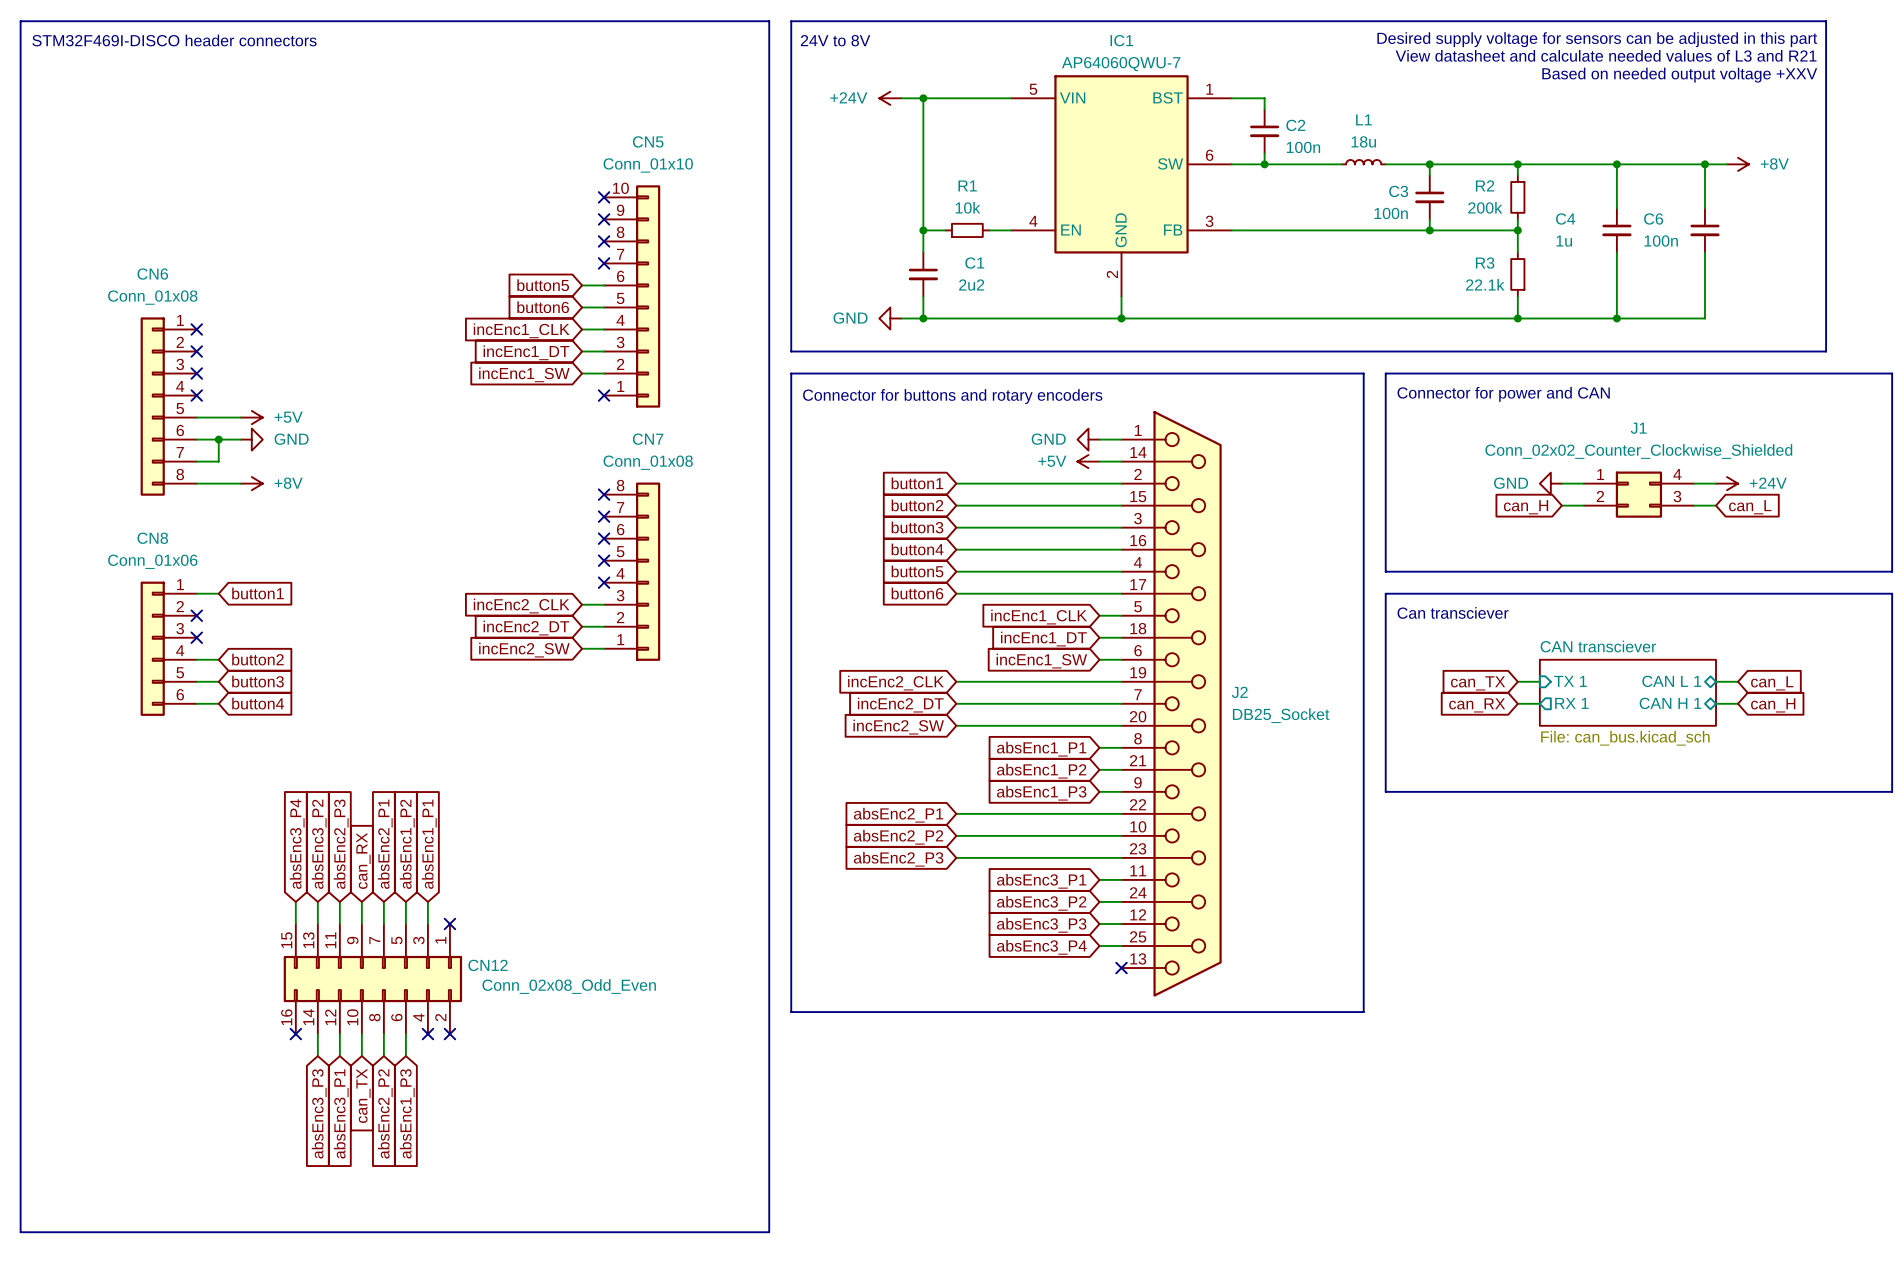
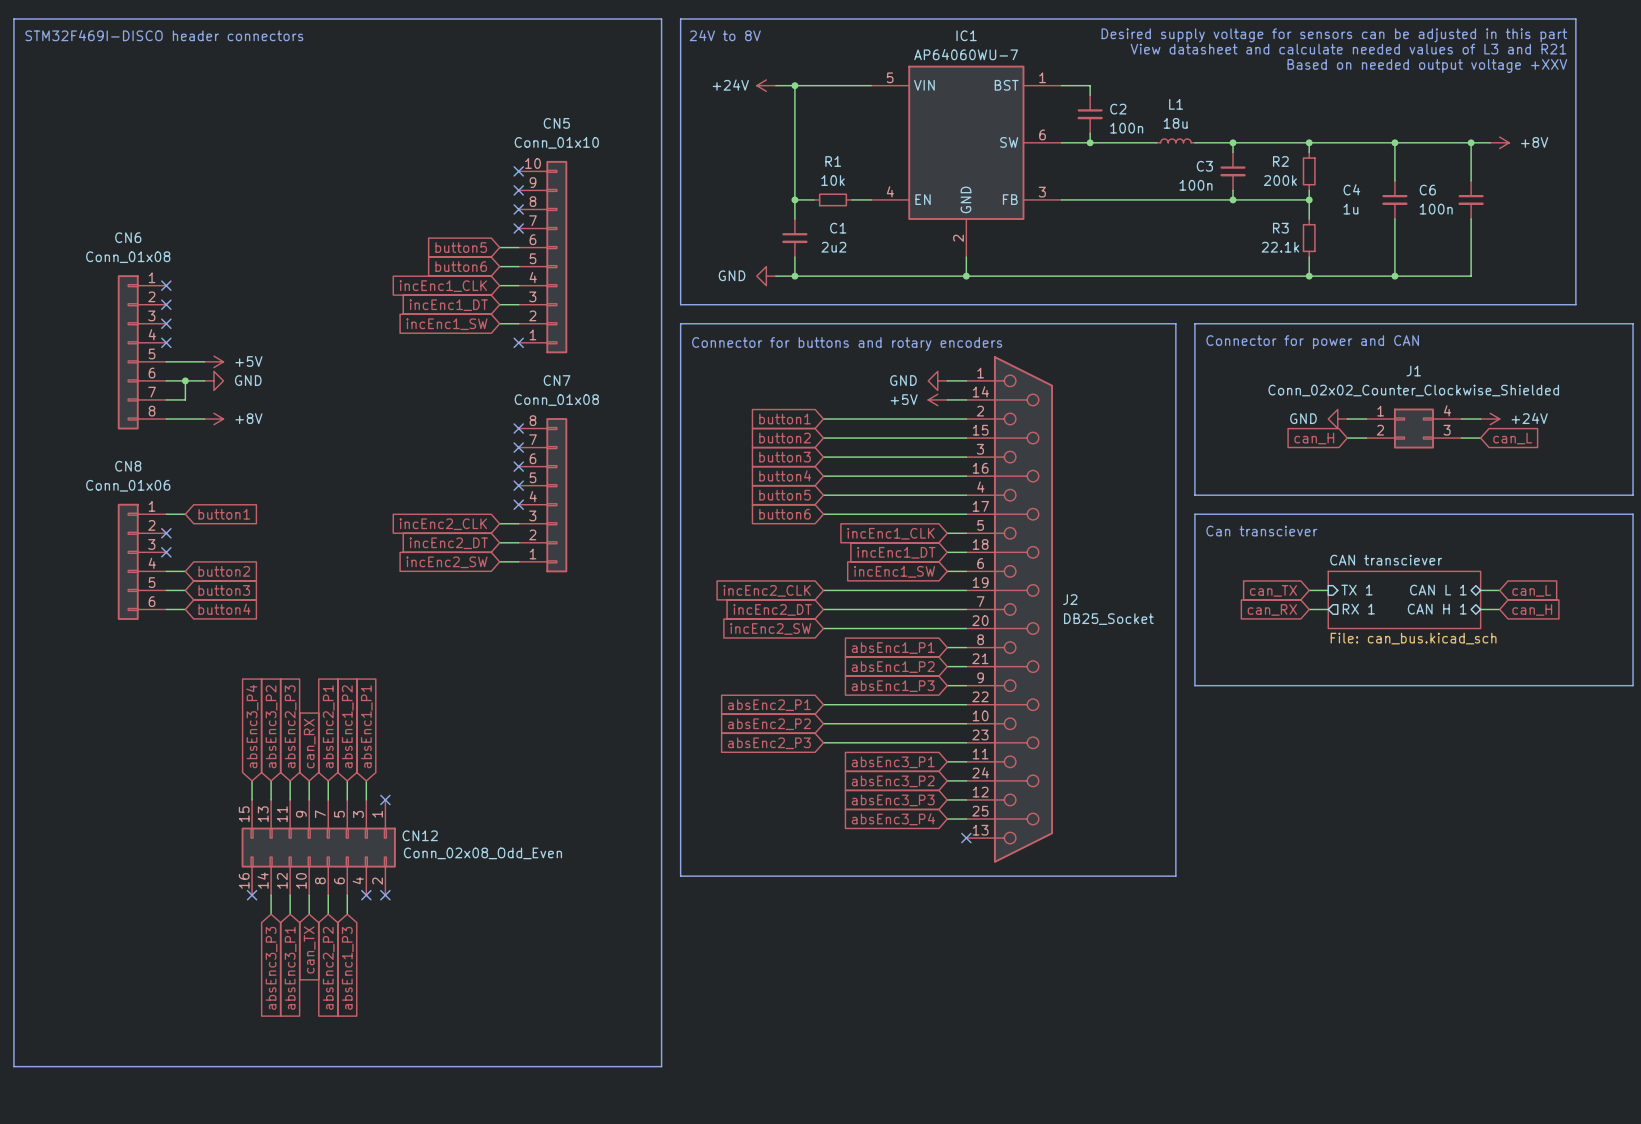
IC1 value: AP64060QWU-7 (1121, 64) -> AP64060WU-7 (966, 54)

